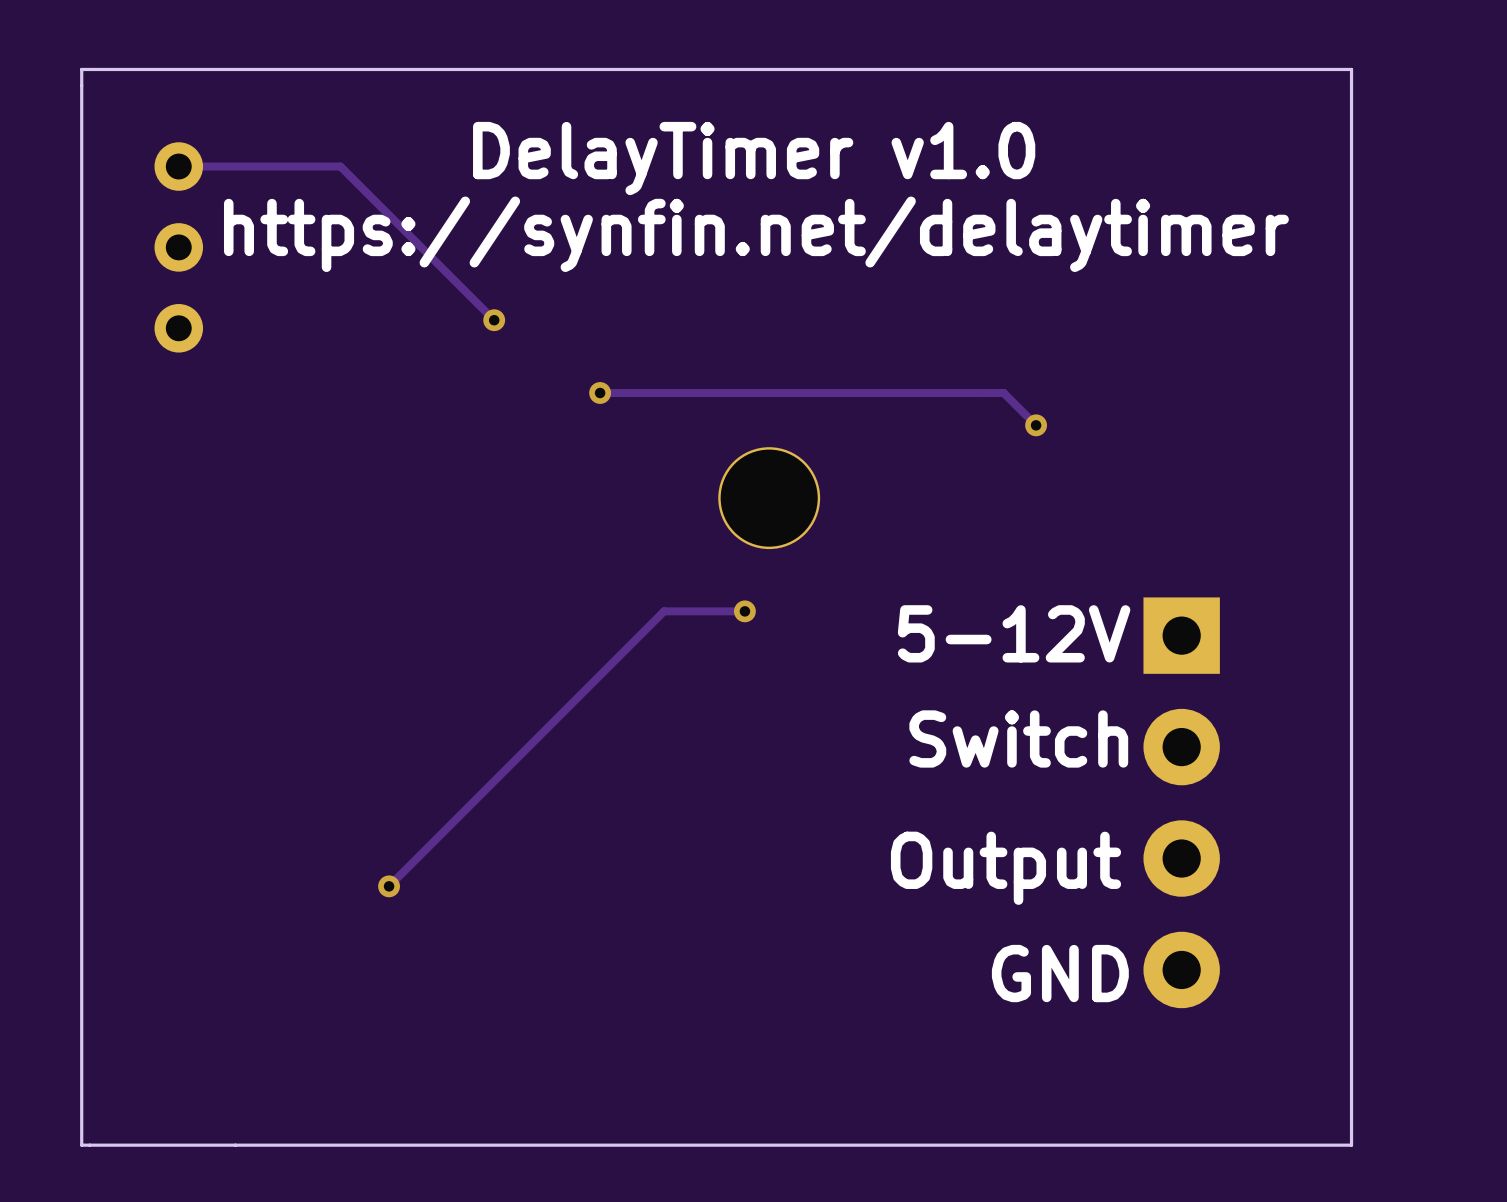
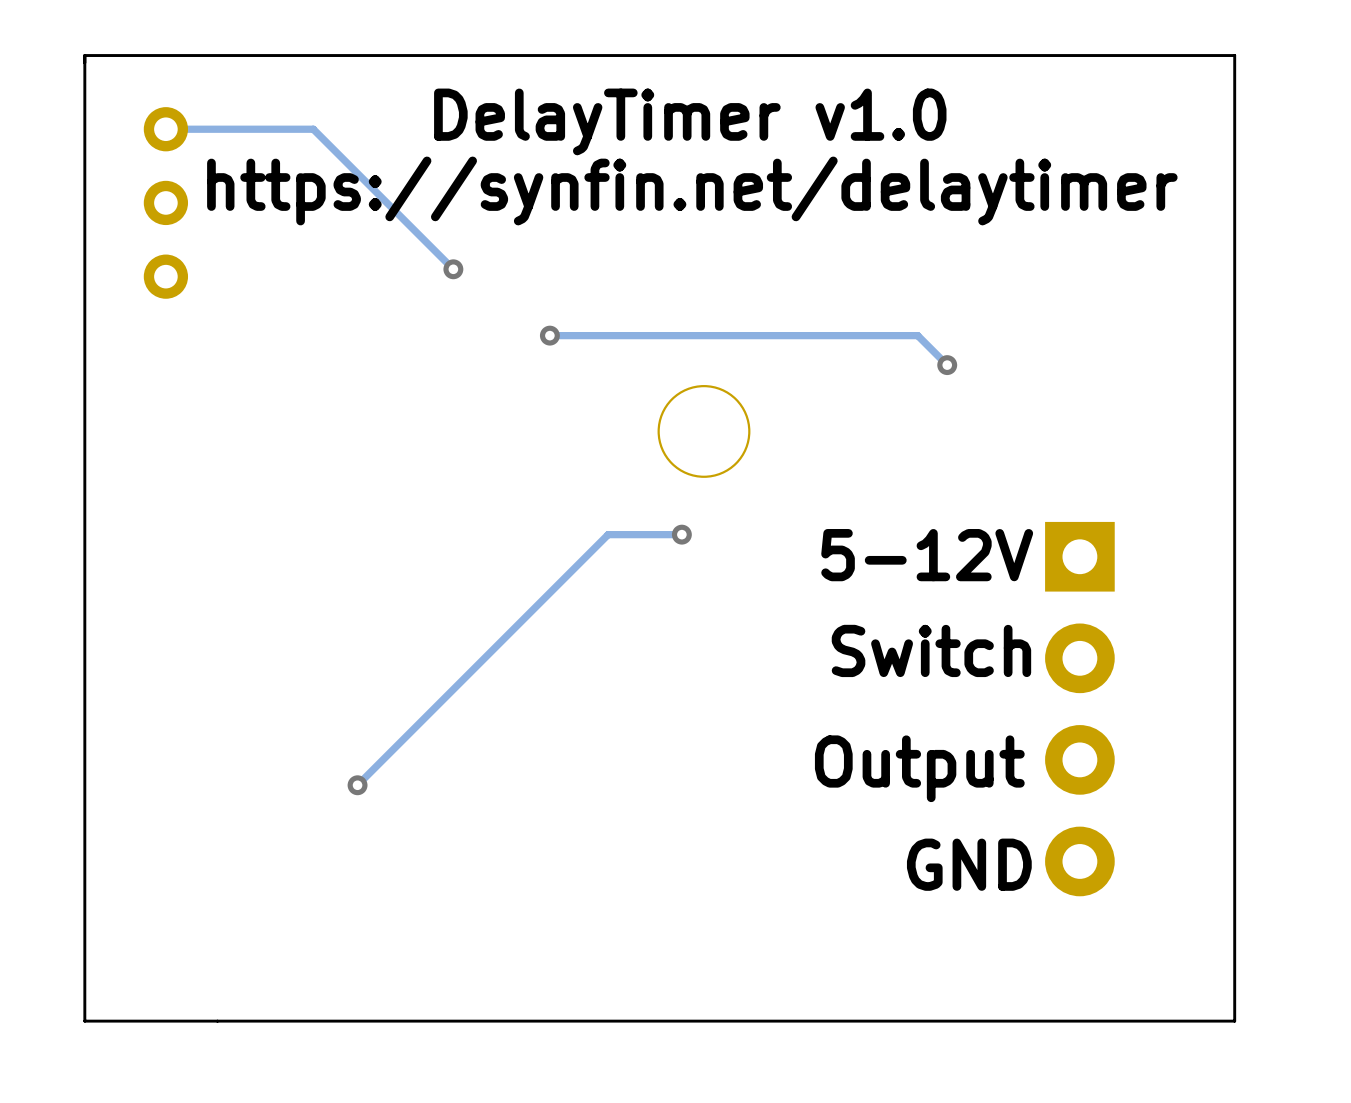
board edge: (1351, 85) (1351, 69) (81, 69) (81, 1145) (89, 1145) -> (1234, 55) (84, 55) (84, 1021)

